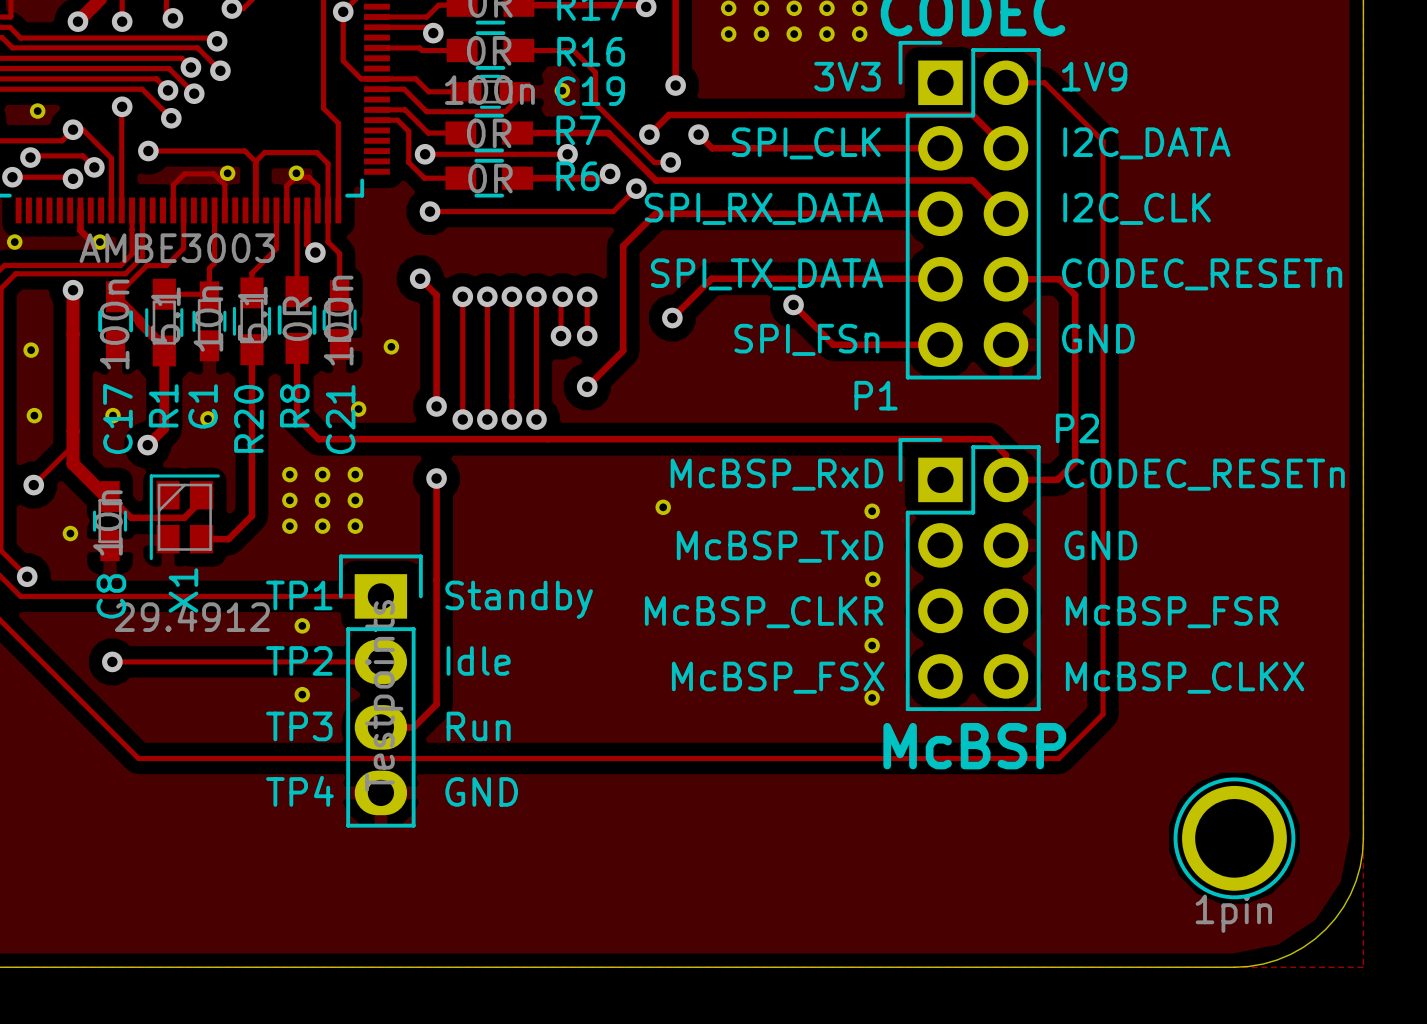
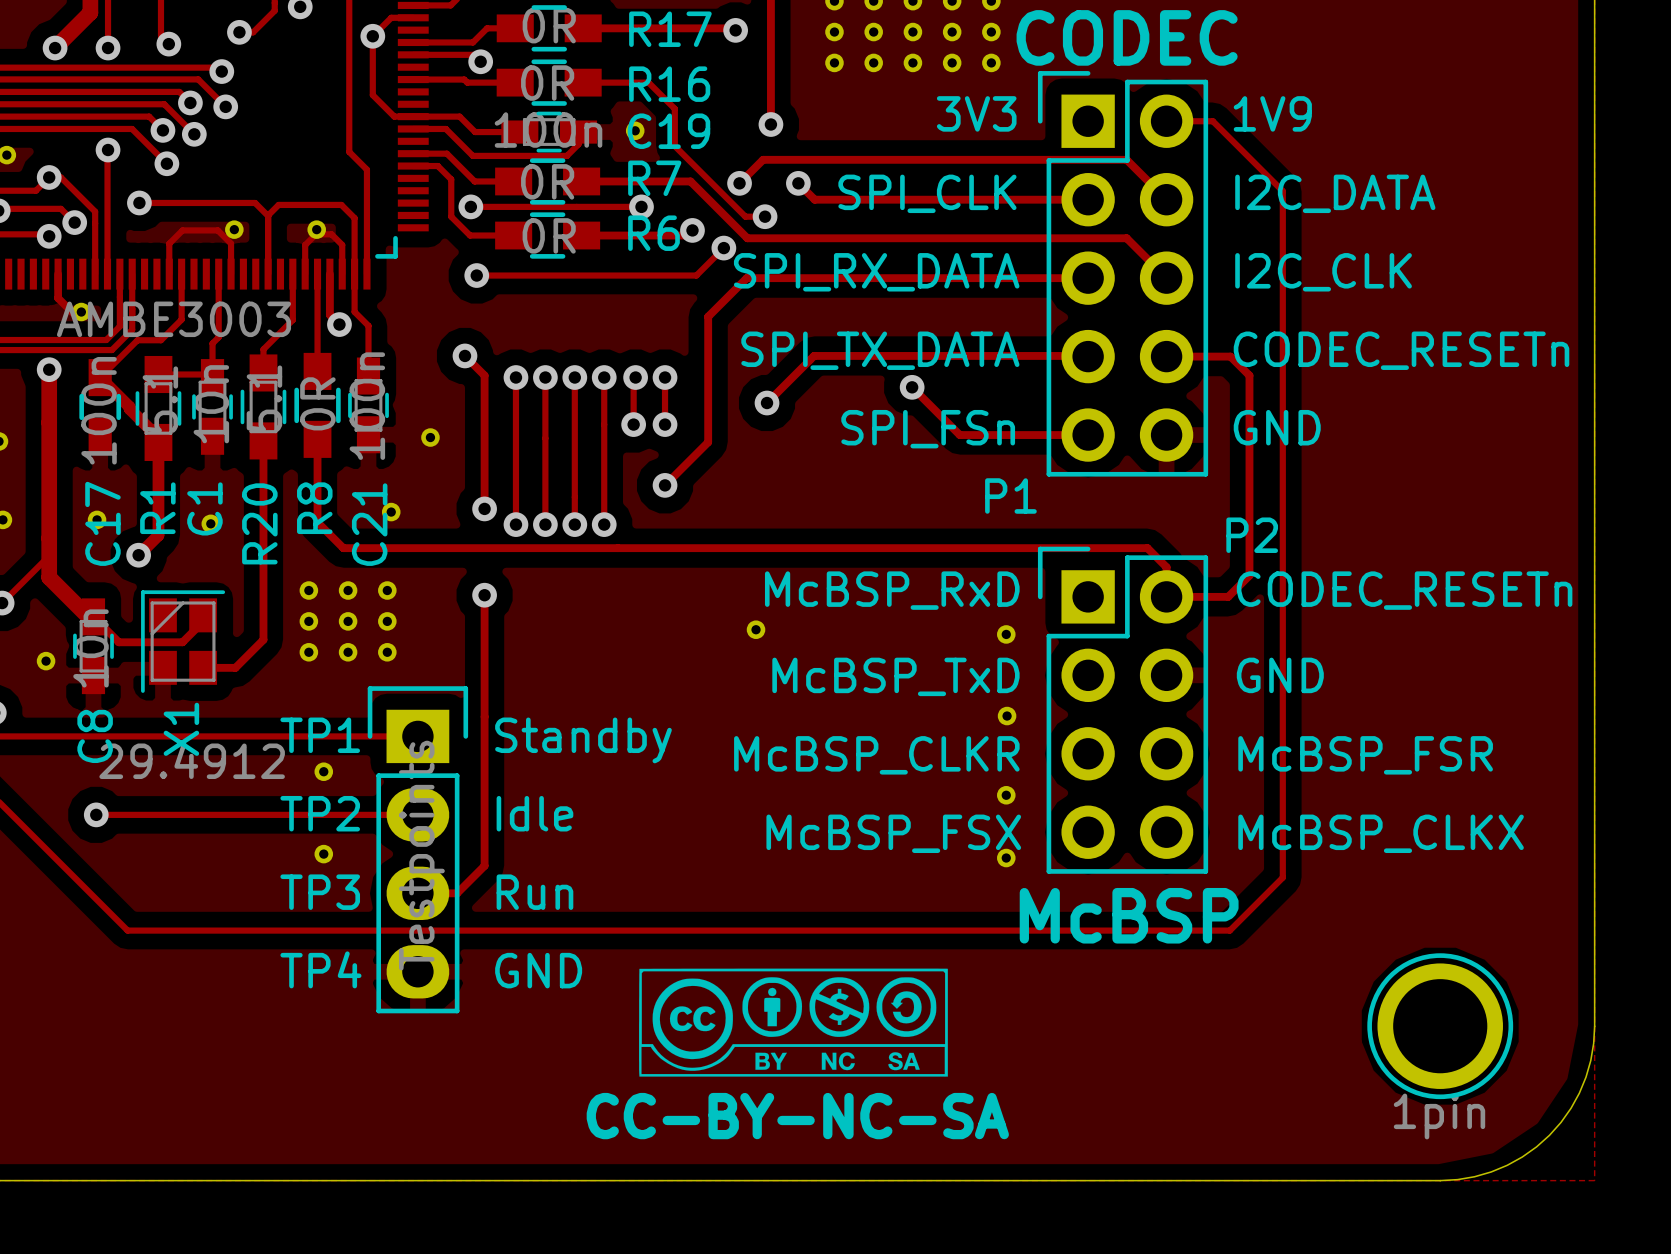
drawing: none -> [639, 968, 948, 1077]
text: none -> CC-BY-NC-SA (797, 1116)

